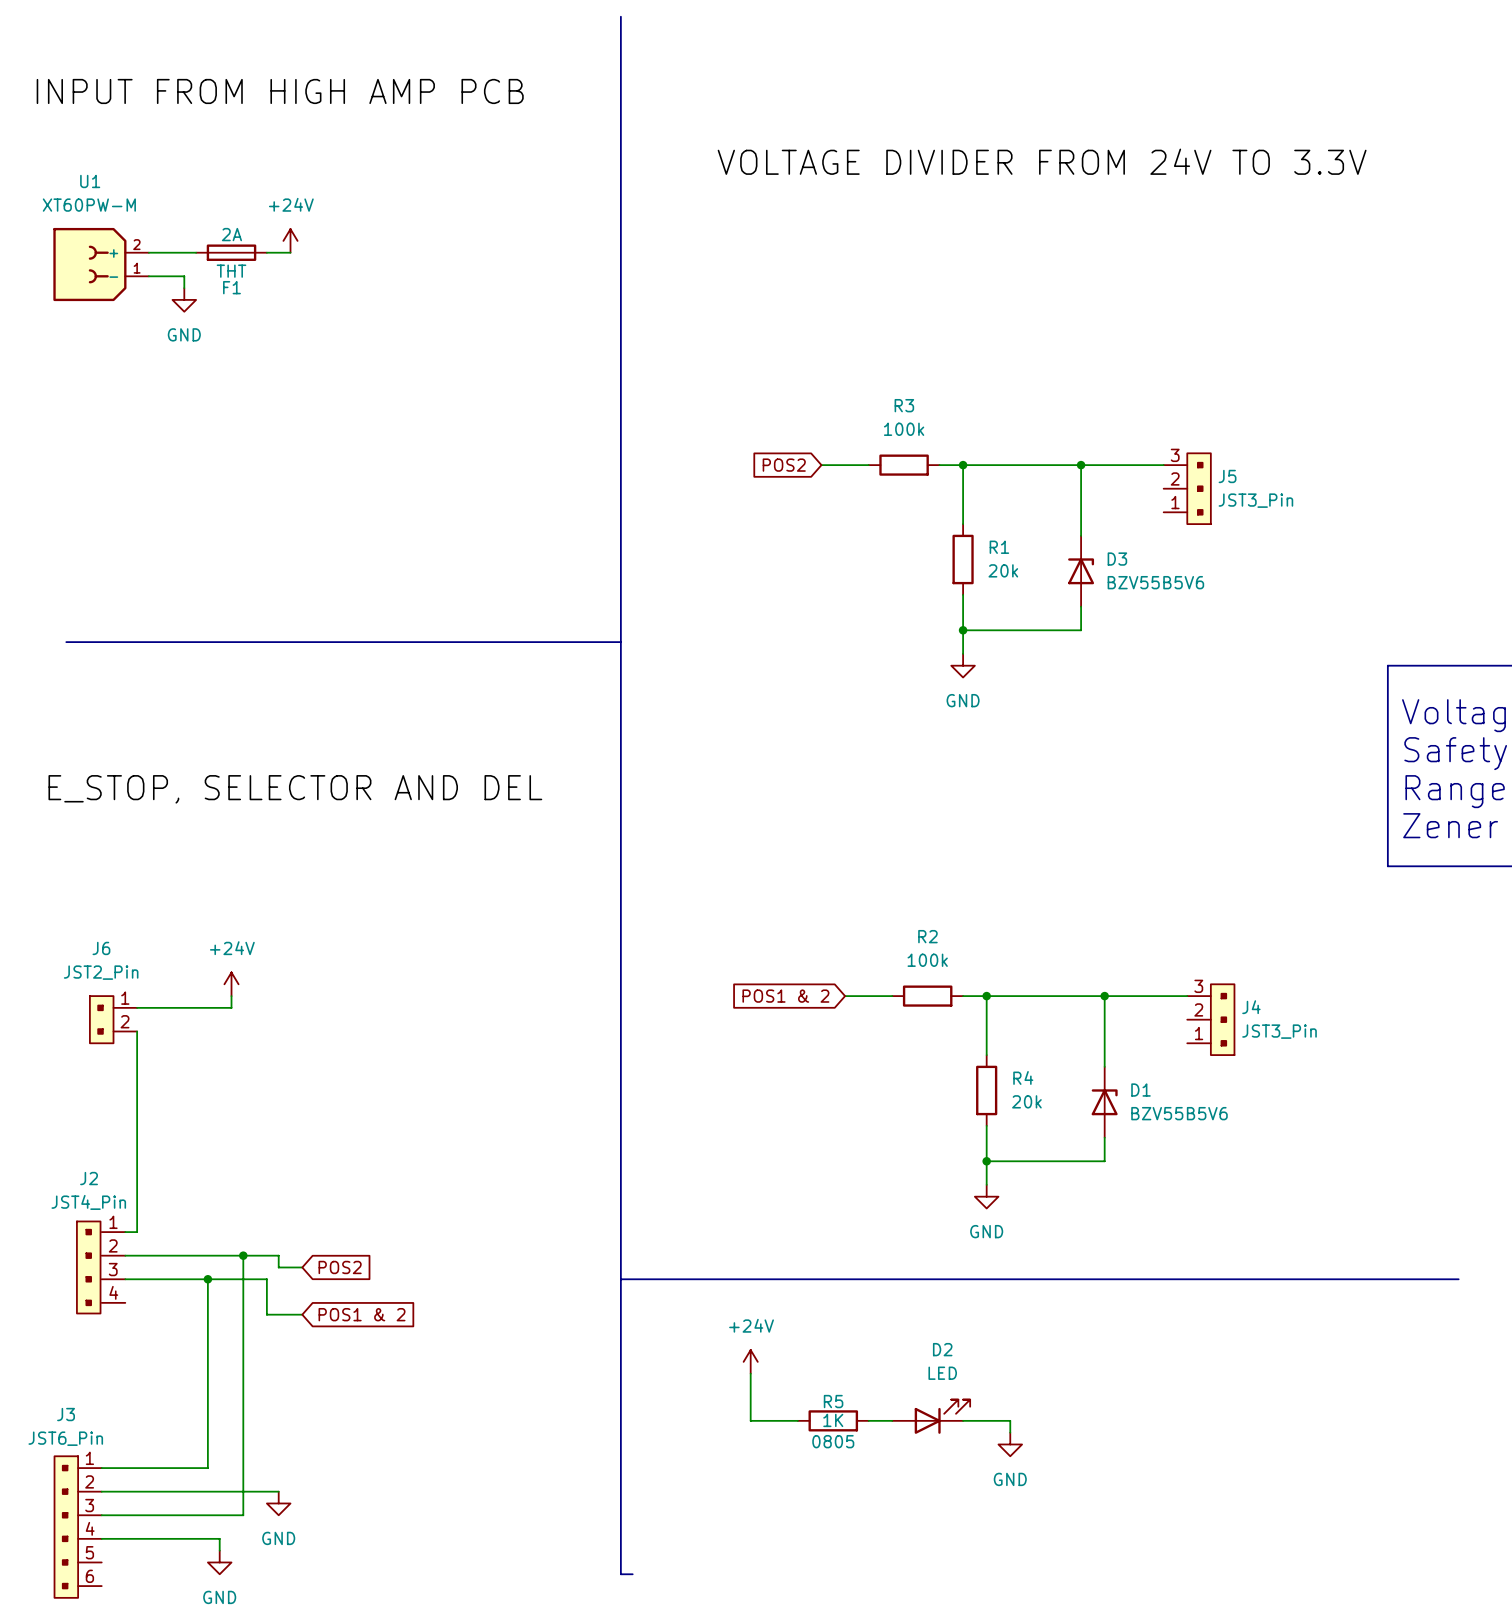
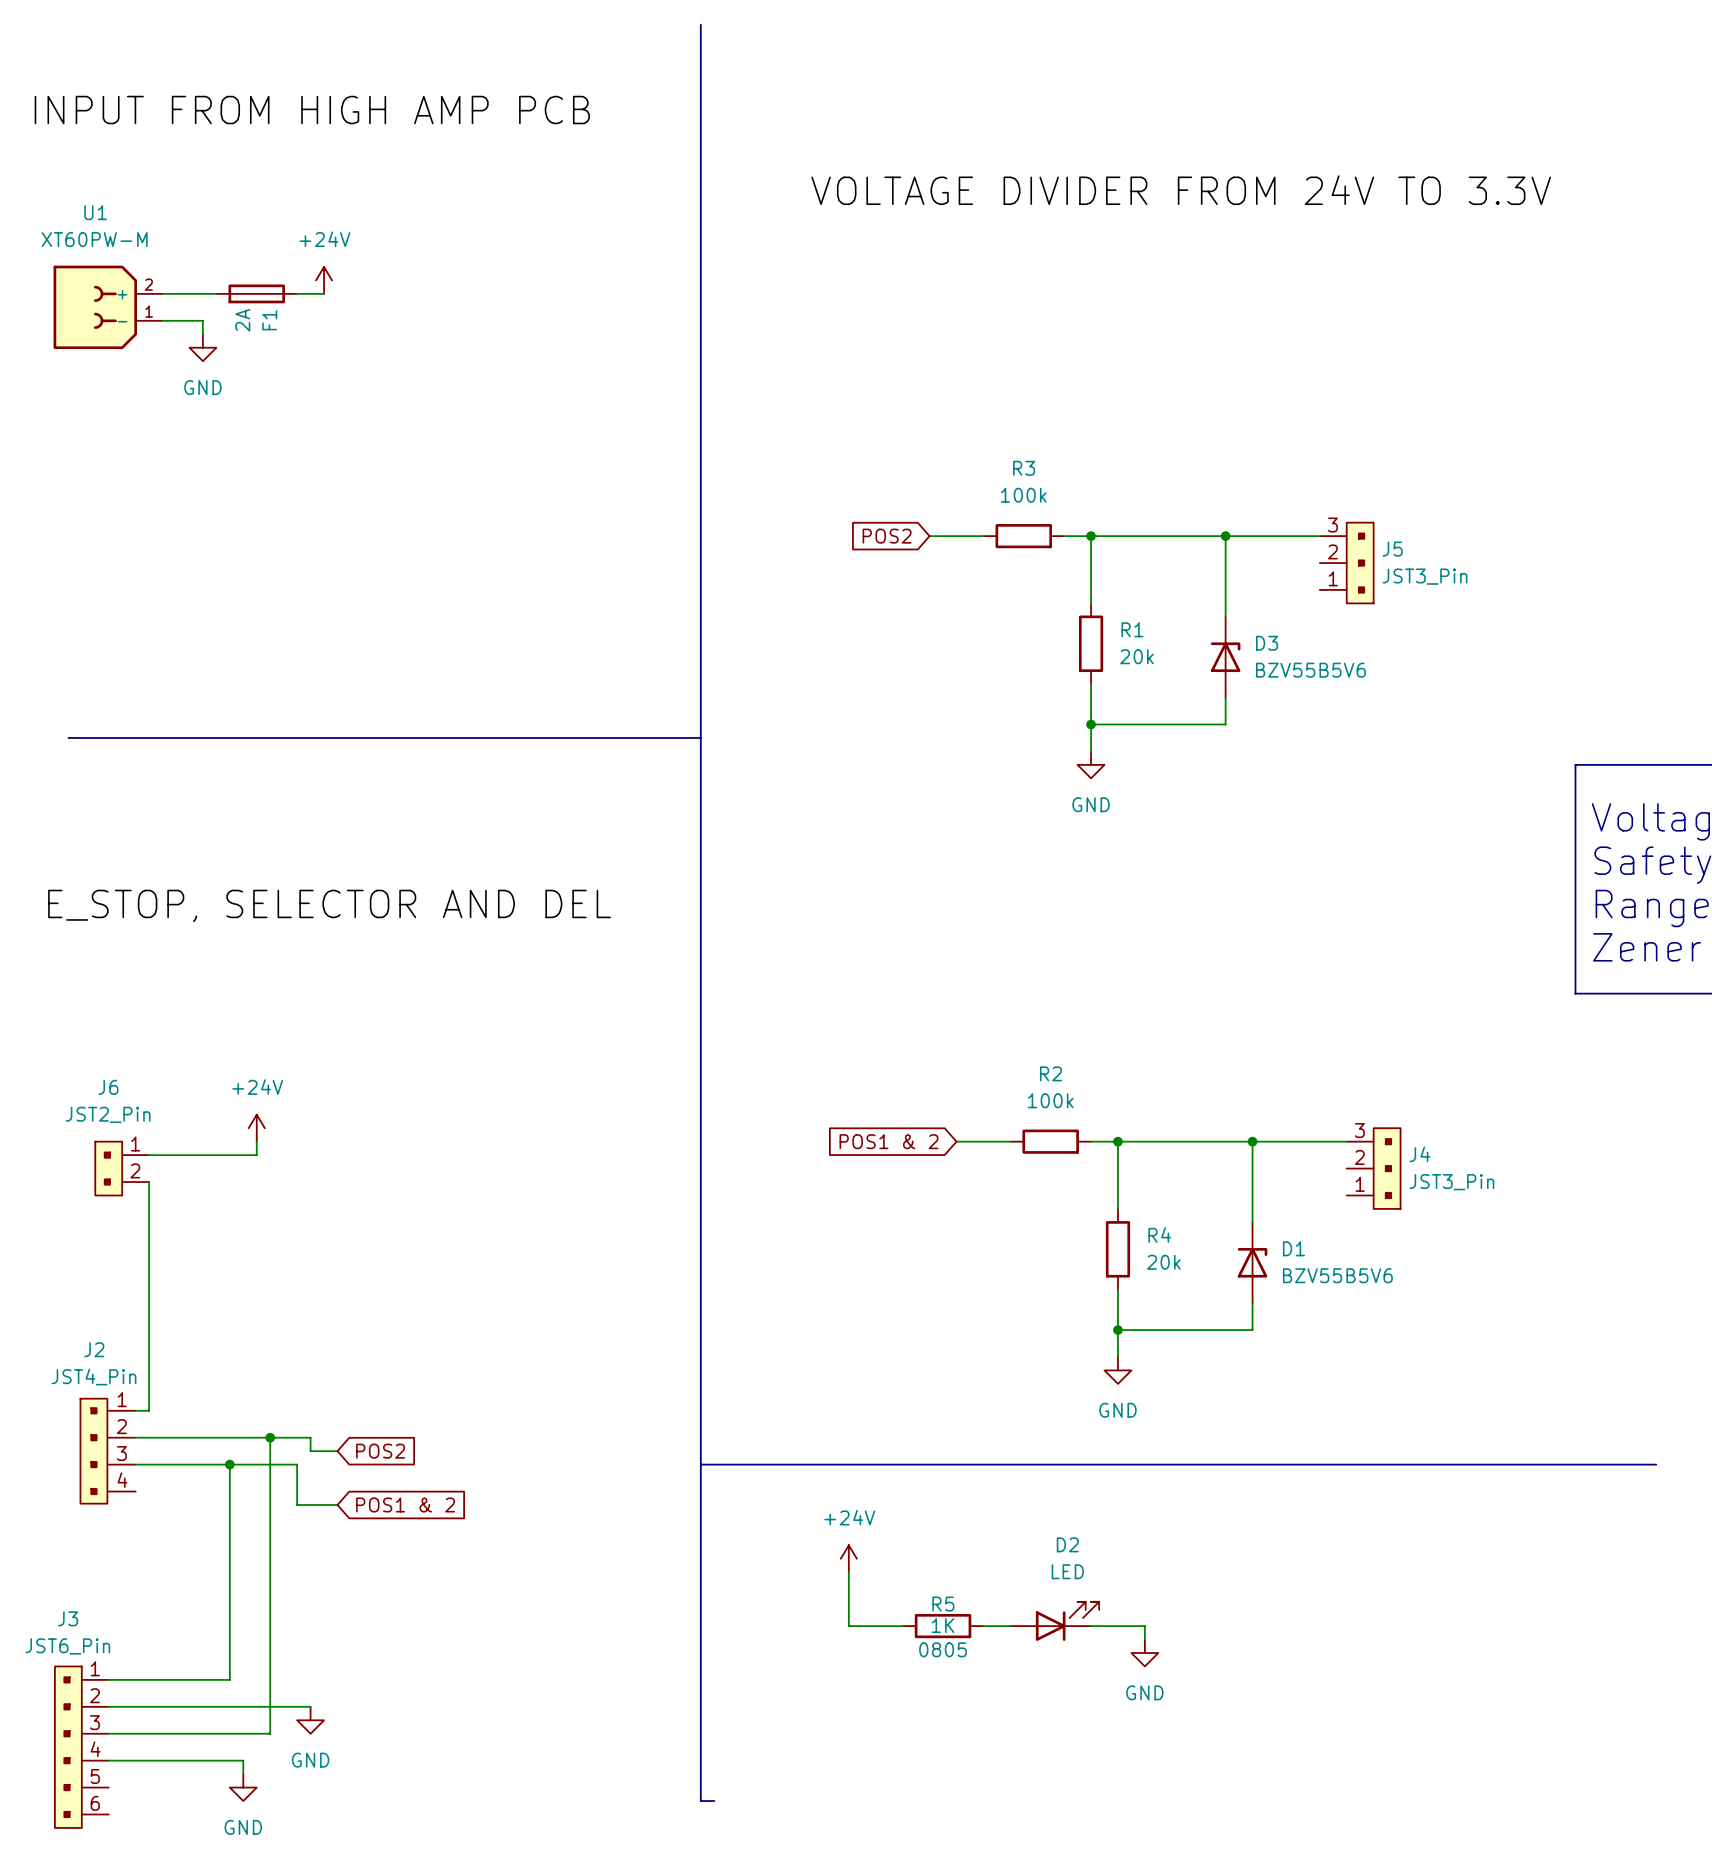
F1 value rotation: 0° (231, 234) -> 90° counterclockwise (242, 320)
F1 value position: 2A (231, 234) -> 2A (242, 320)
F1 text: THT (231, 271) -> none
F1 name rotation: 0° (231, 287) -> 90° counterclockwise (269, 320)

